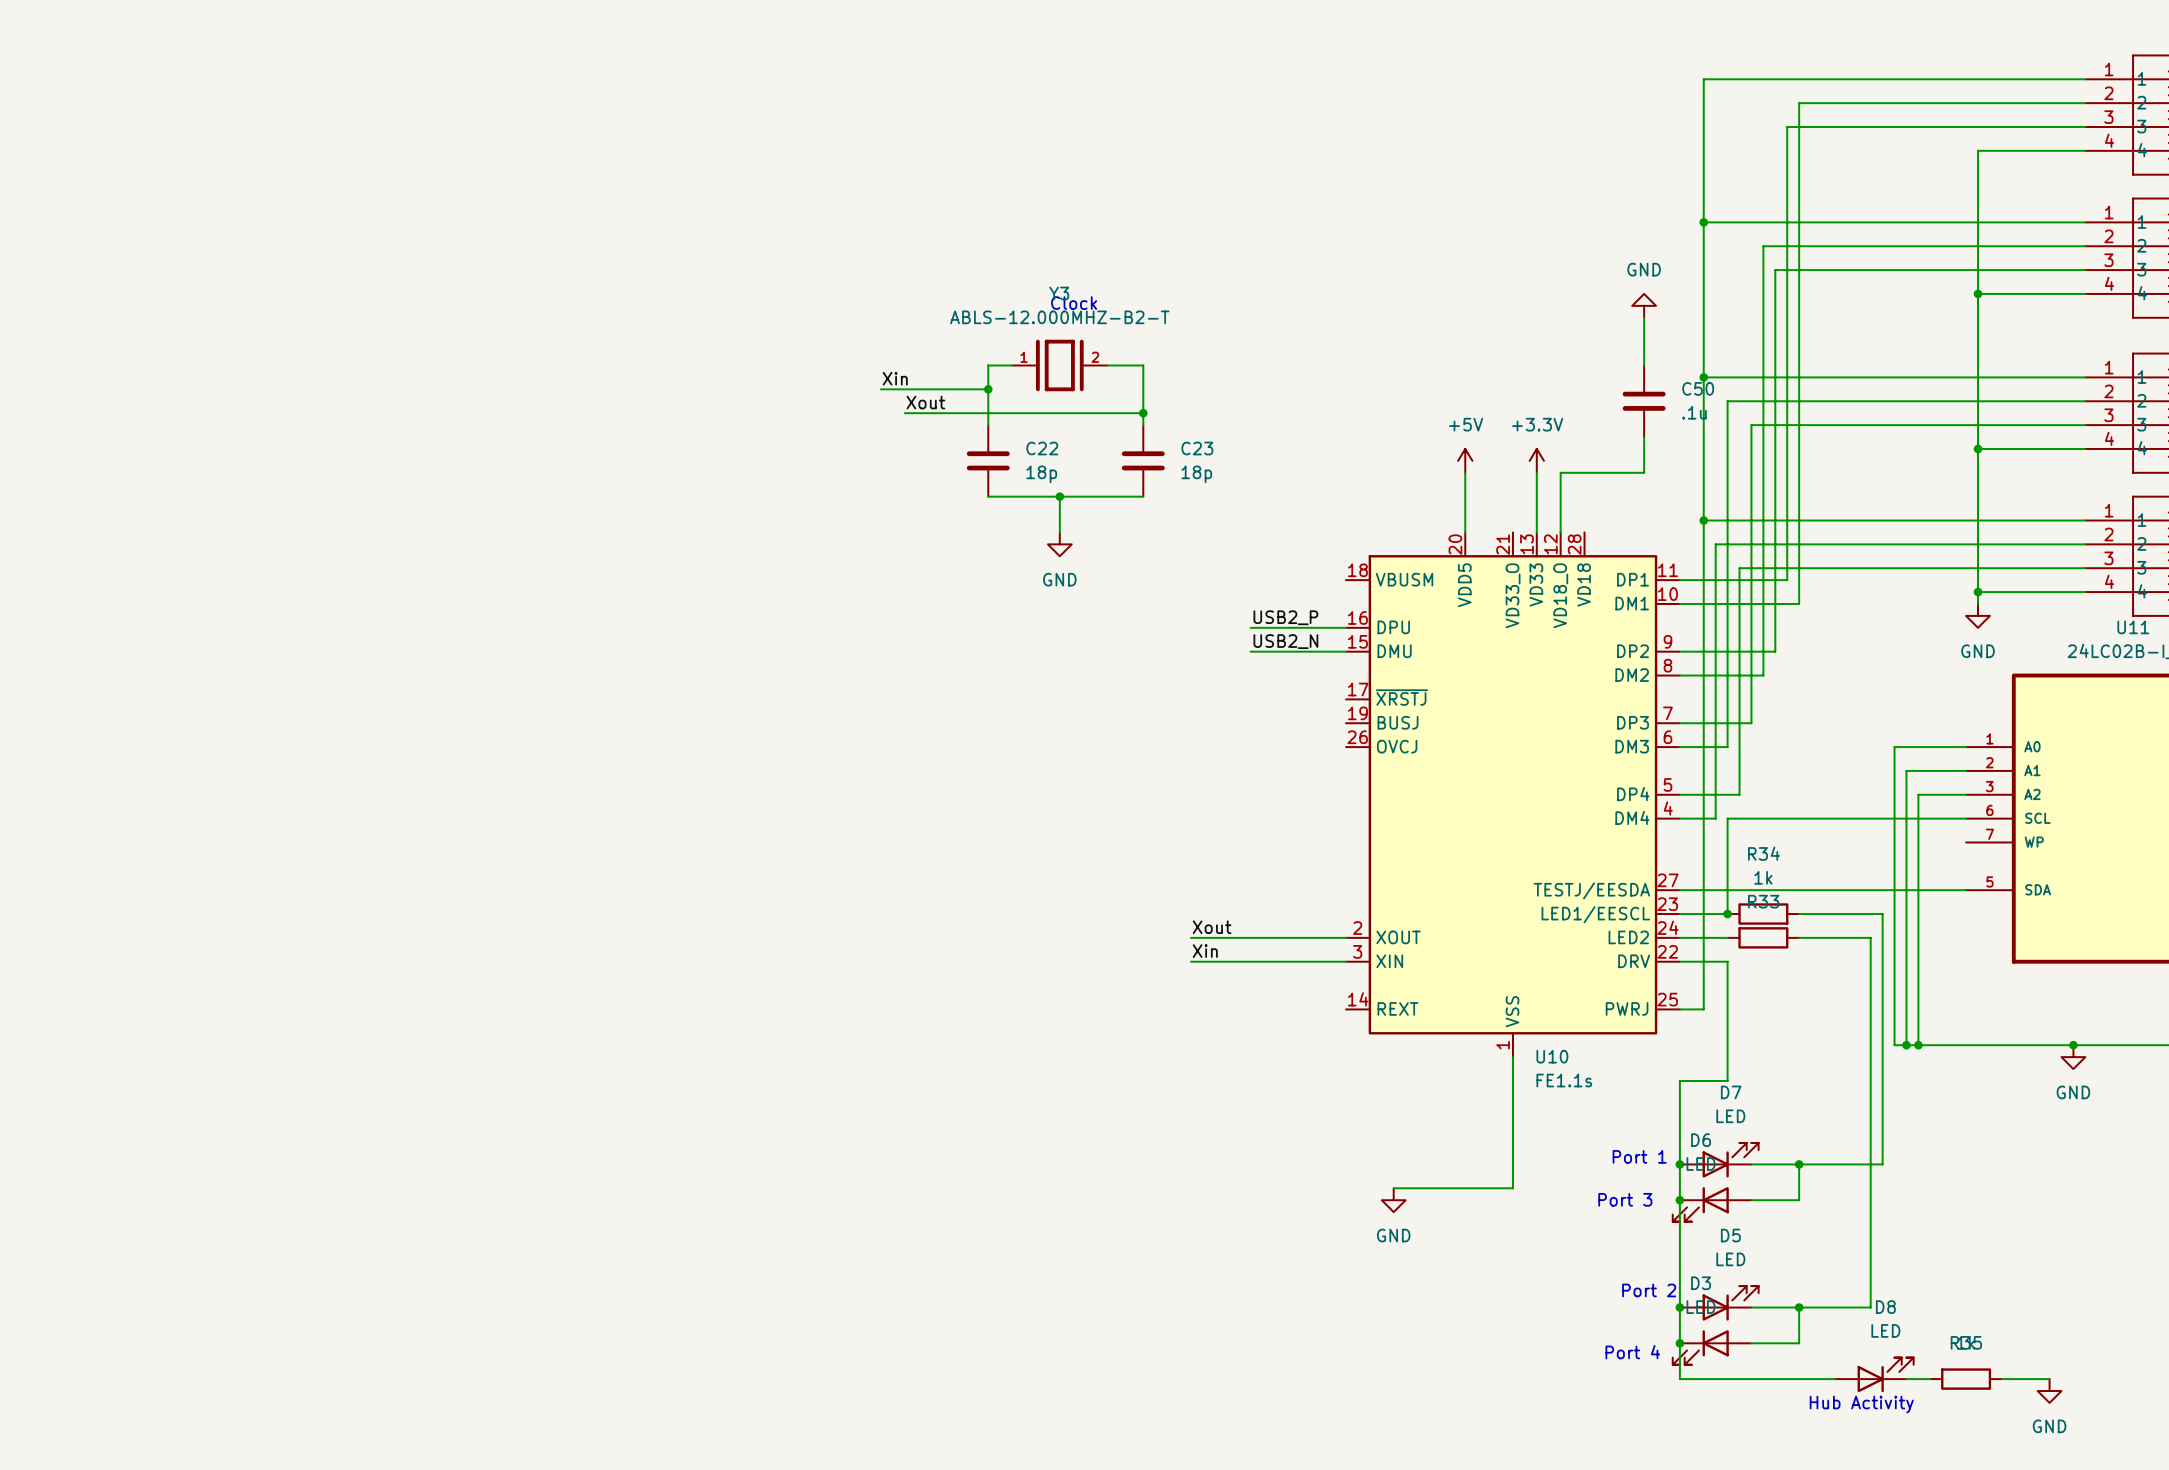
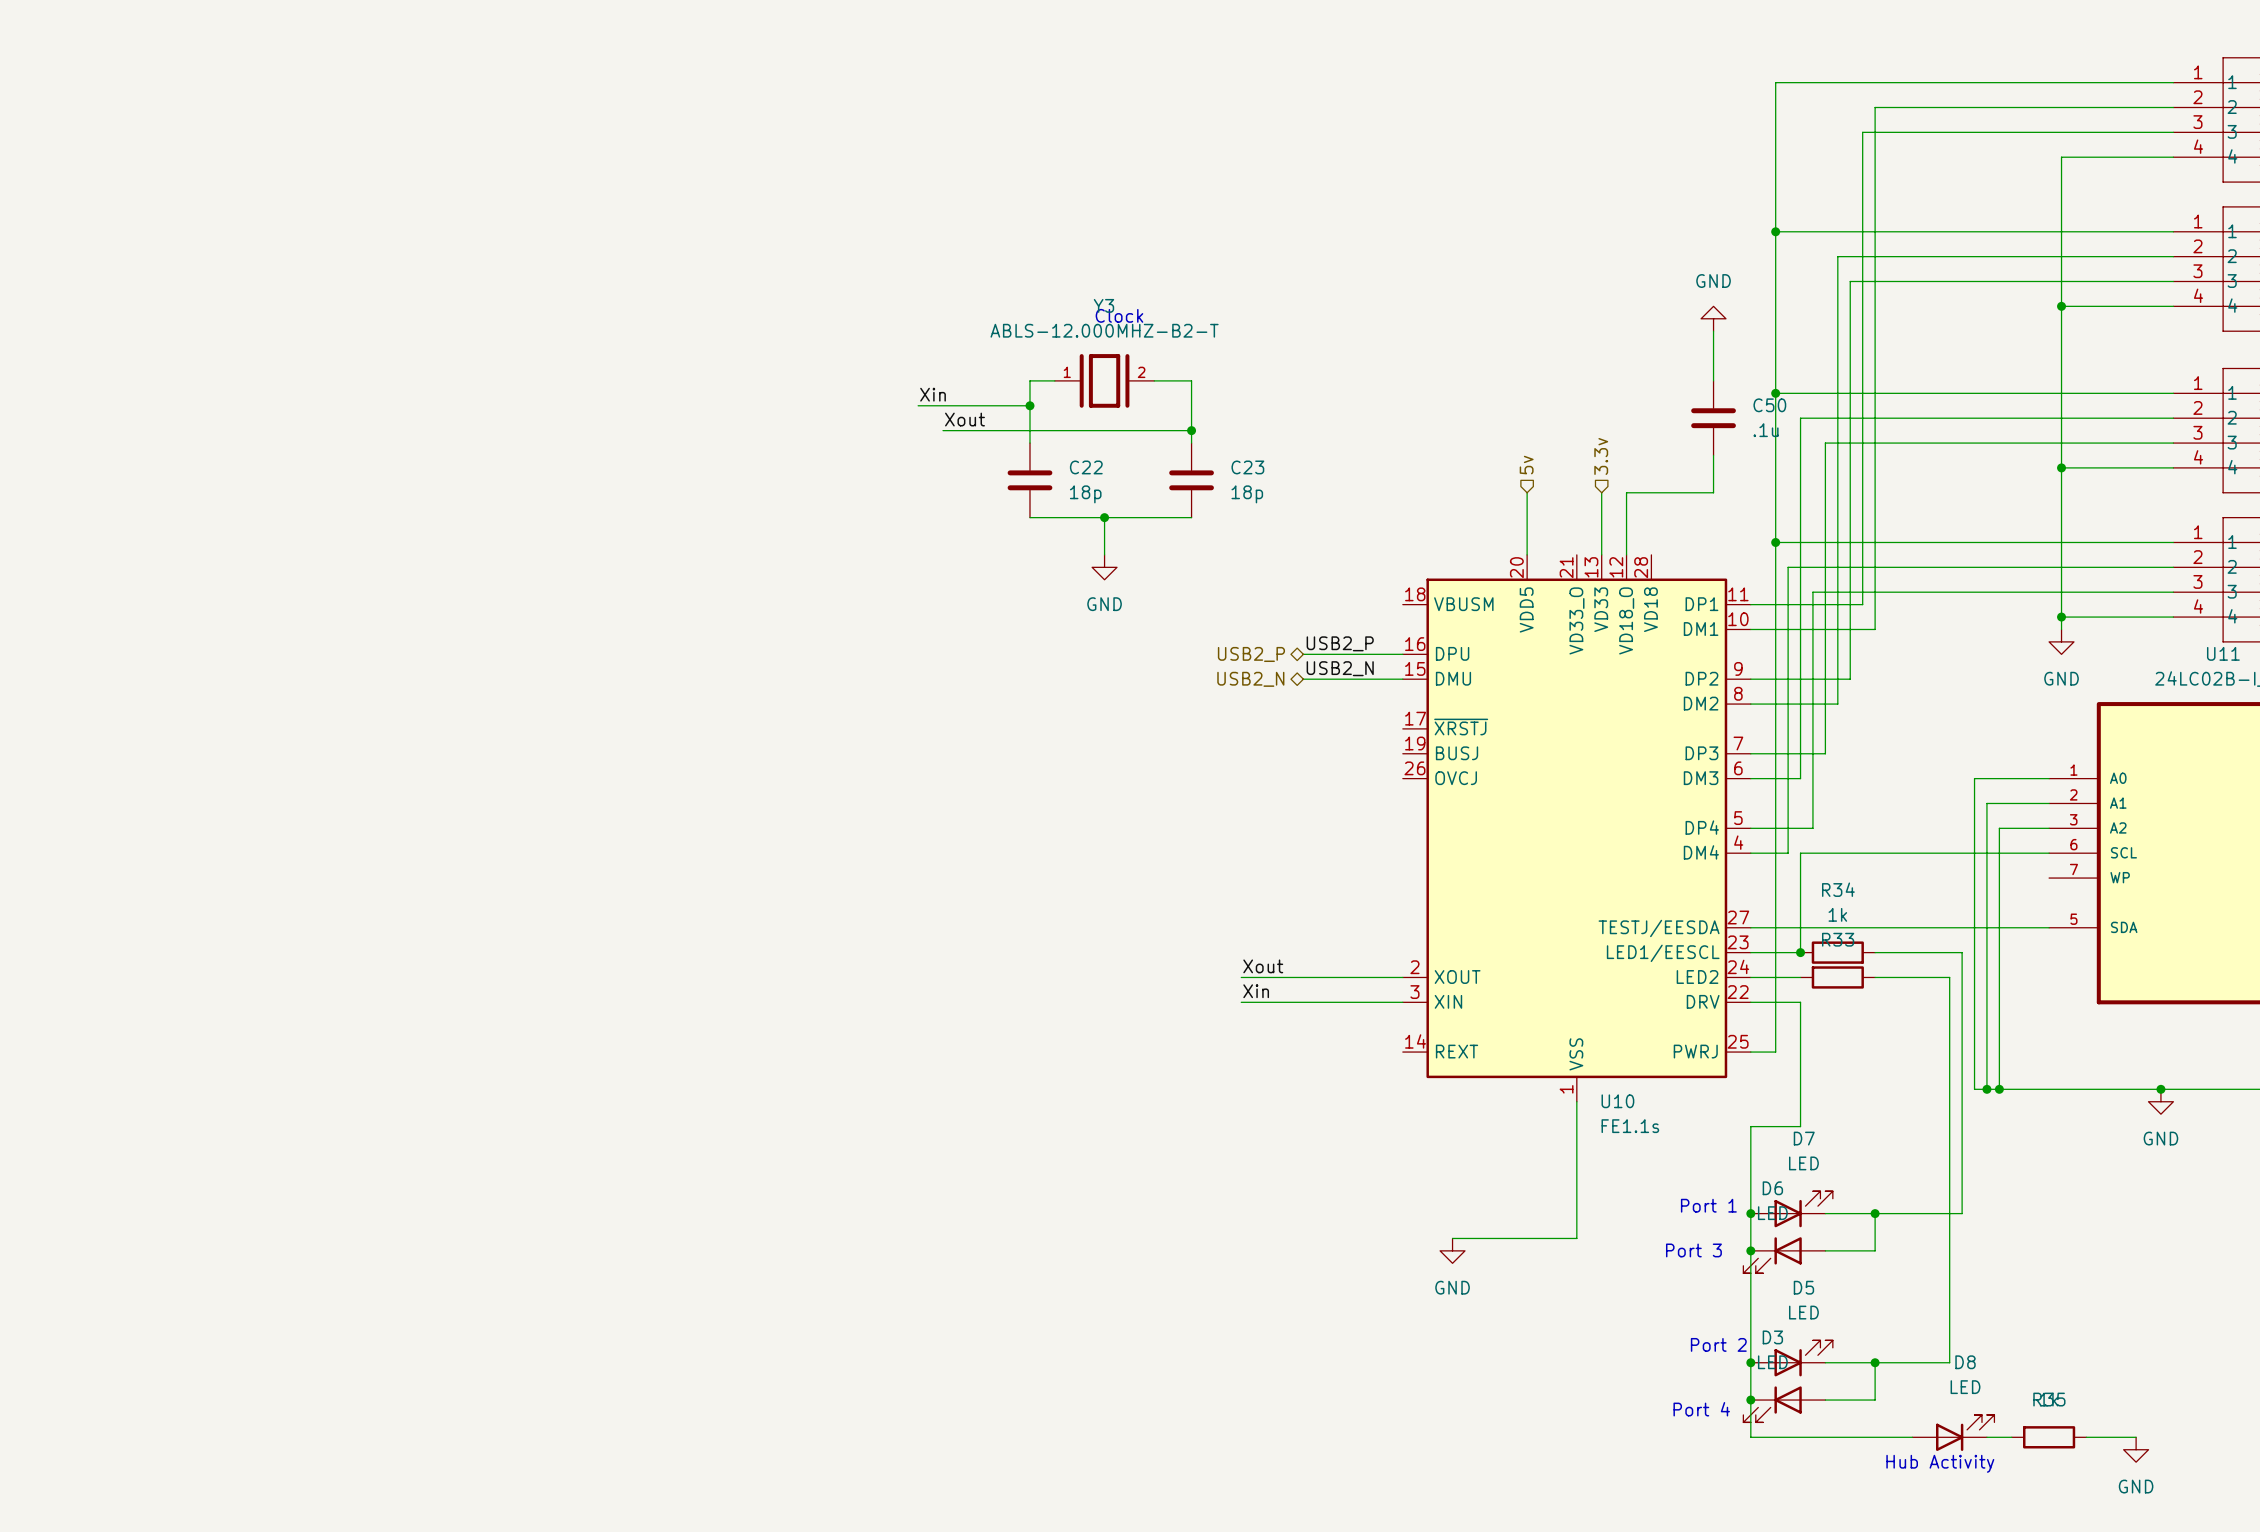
hierarchical label: none -> 3.3v (1601, 456)
hierarchical label: none -> 5v (1526, 465)
power symbol: +5V (1465, 460) -> none
power symbol: +3.3V (1536, 460) -> none
hierarchical label: none -> USB2_P (1251, 654)
hierarchical label: none -> USB2_N (1250, 679)

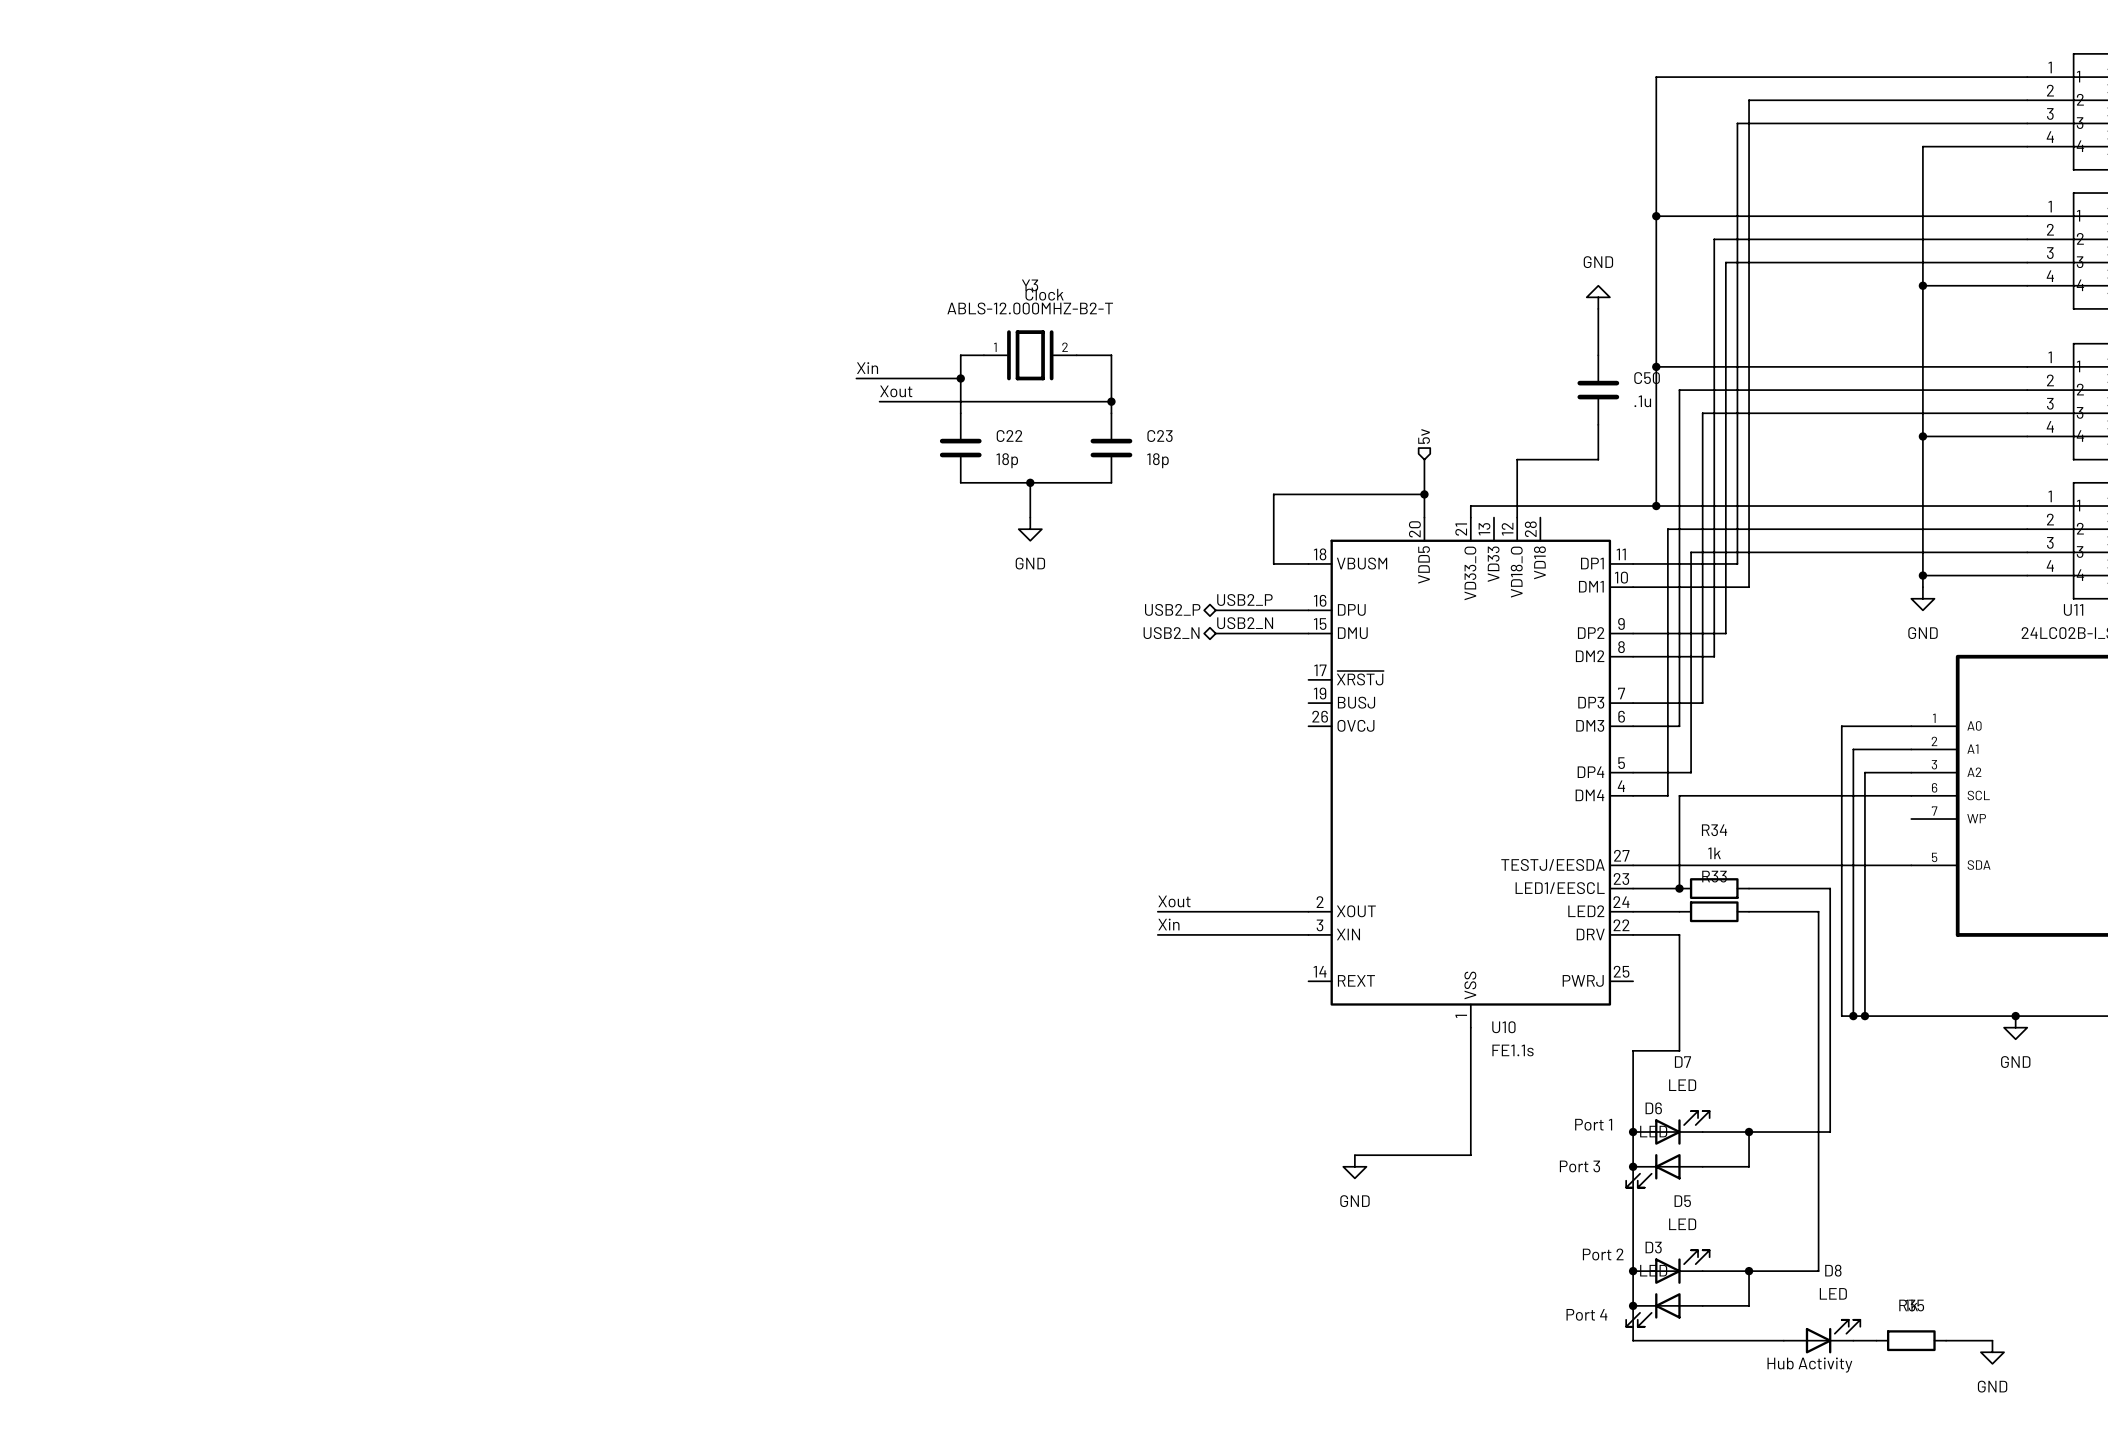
hierarchical label: 3.3v (1601, 456) -> none
wire: (1601, 492) (1601, 554) -> none
wire: none -> (1424, 494) (1273, 494) (1273, 563) (1308, 563)
junction: none -> (1424, 494)
wire: (1775, 542) (1775, 1052) (1750, 1052) -> (1656, 506) (1470, 506) (1470, 517)

